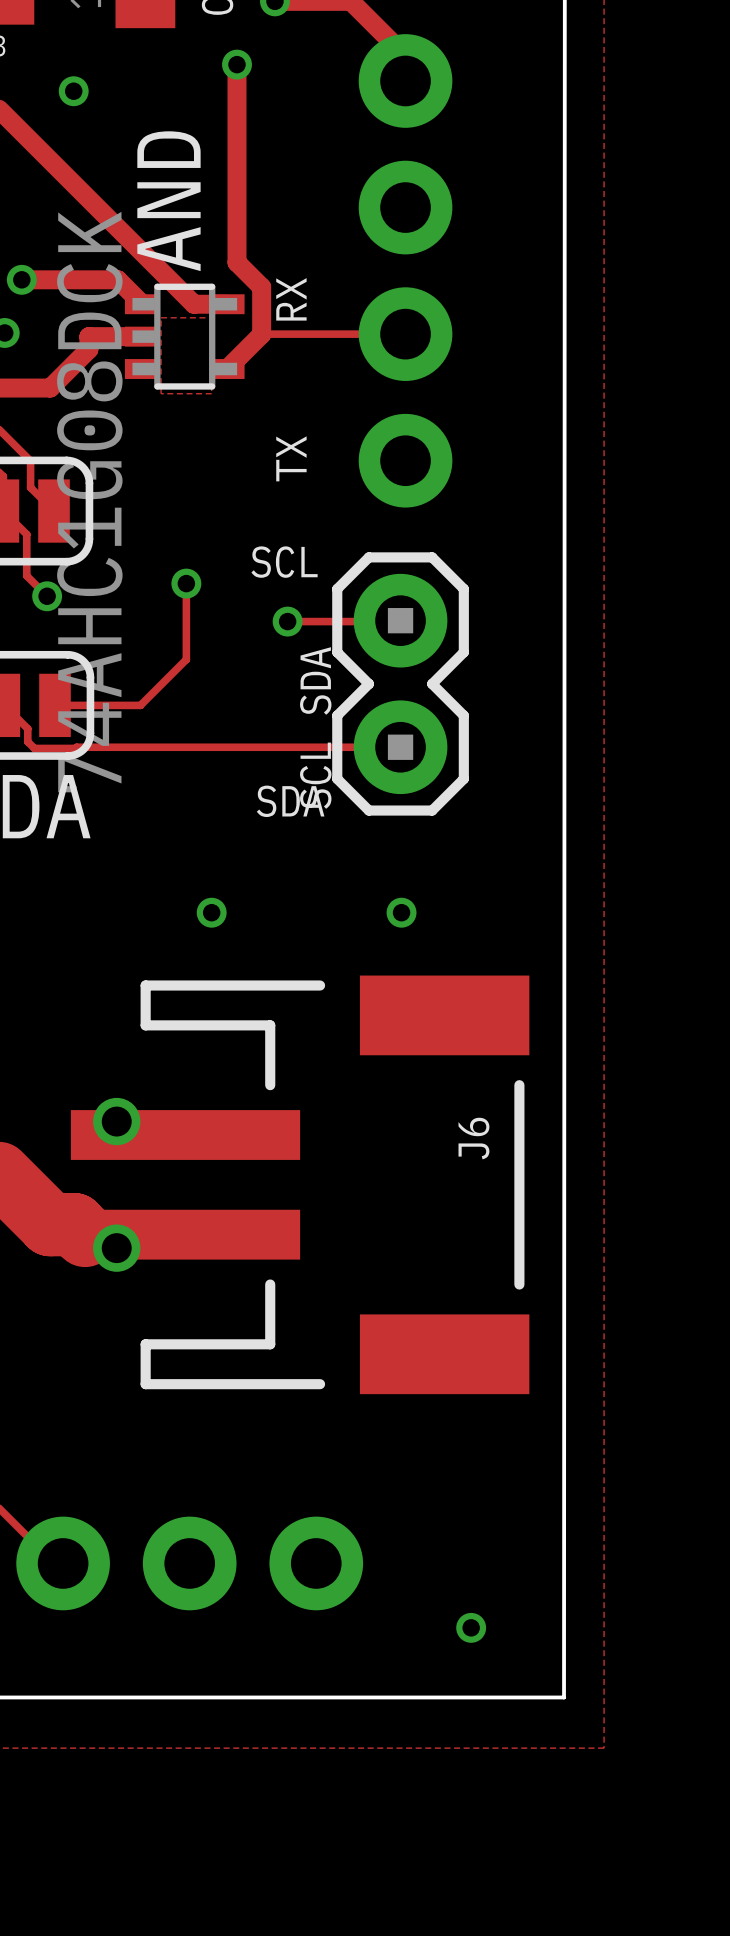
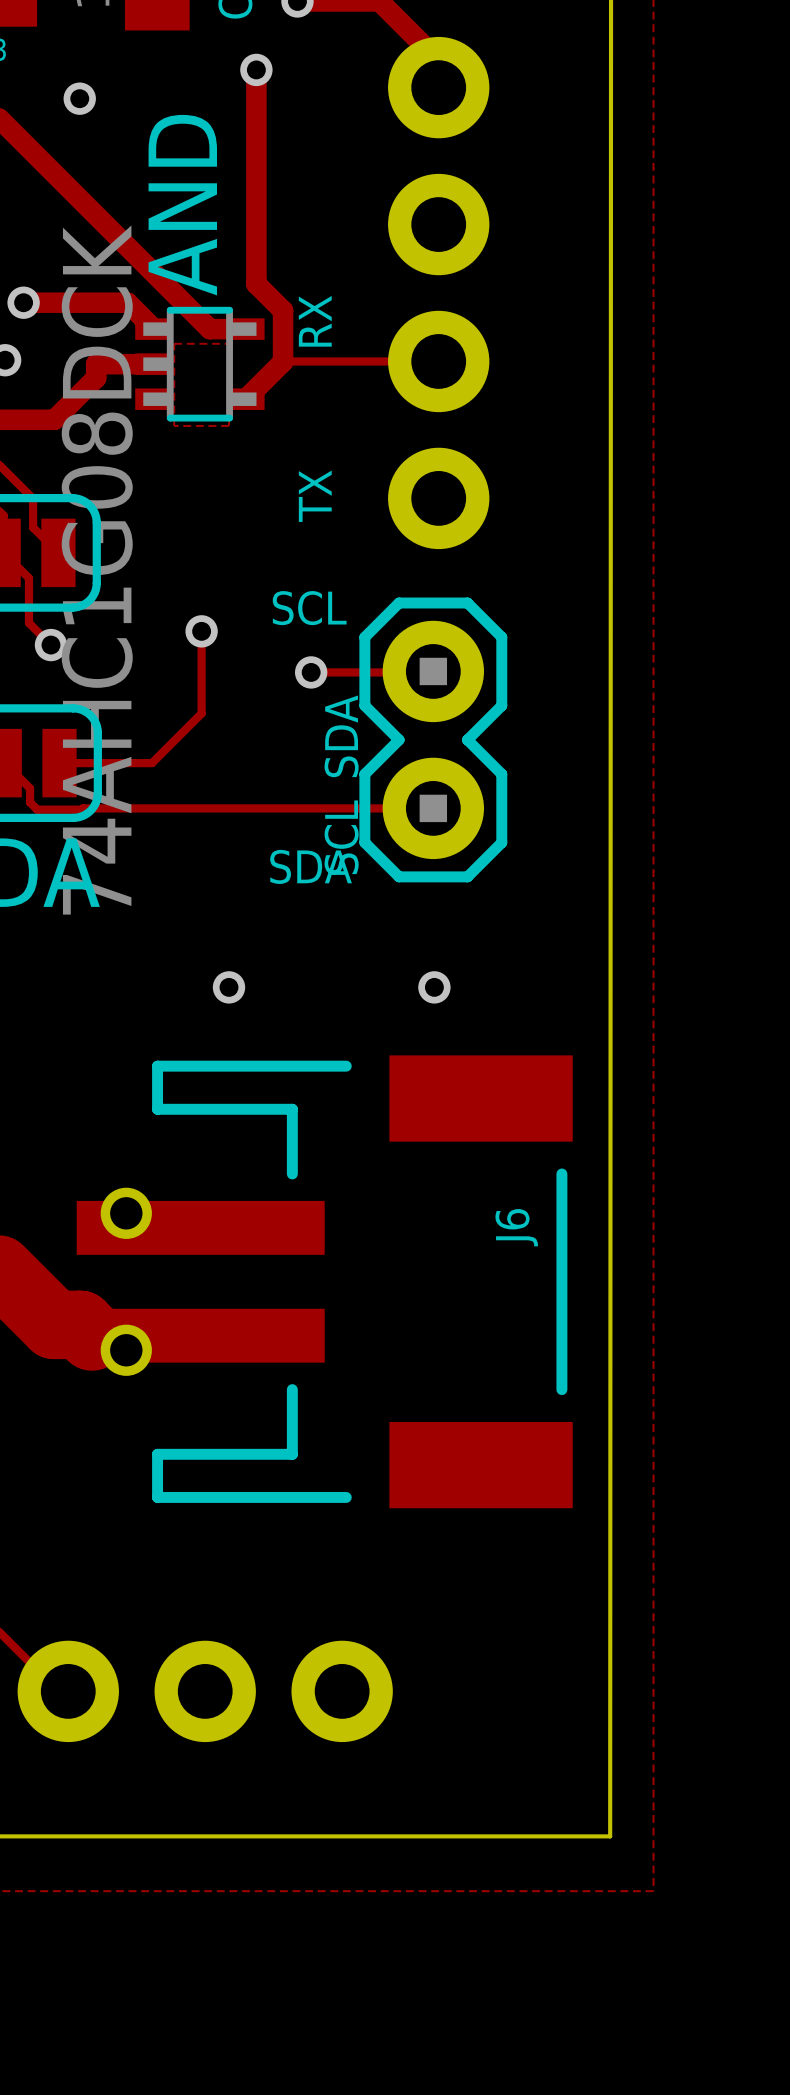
via: (471, 1627) -> none

